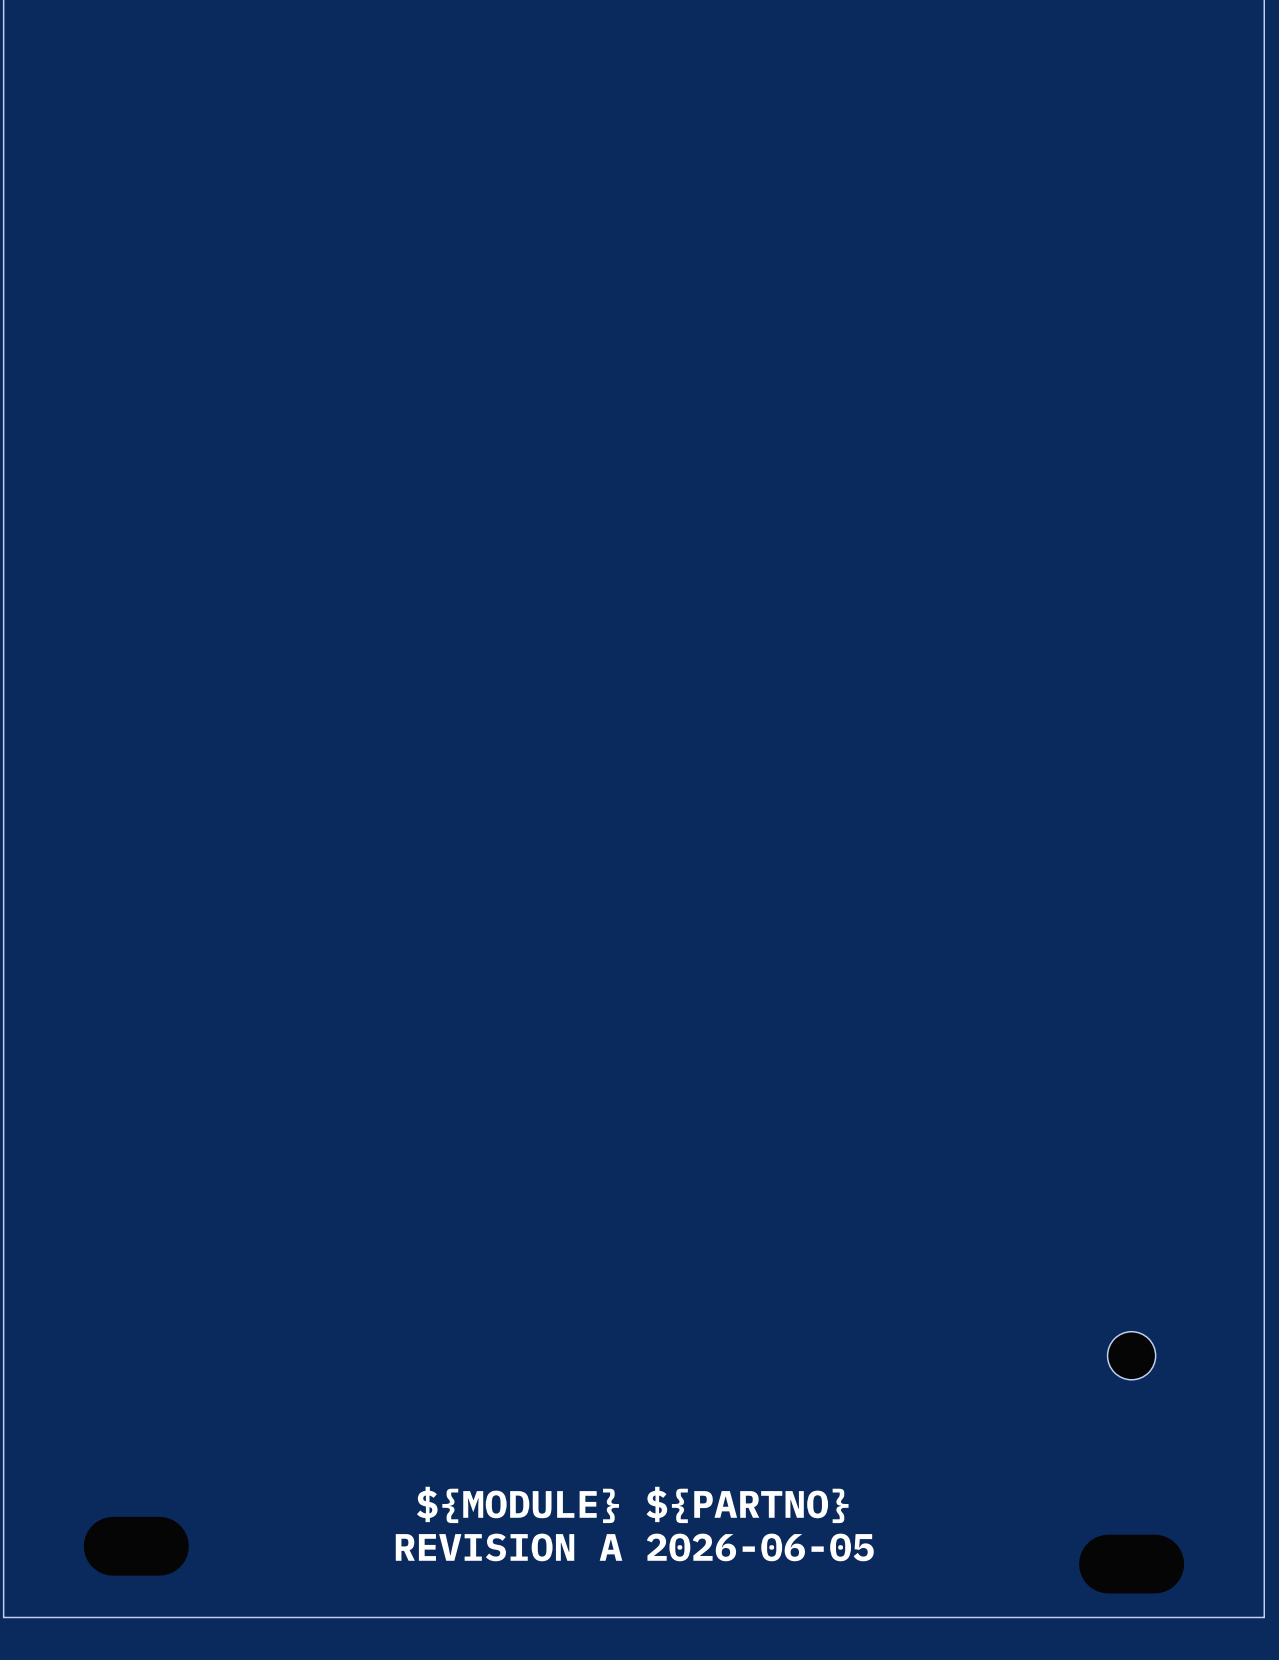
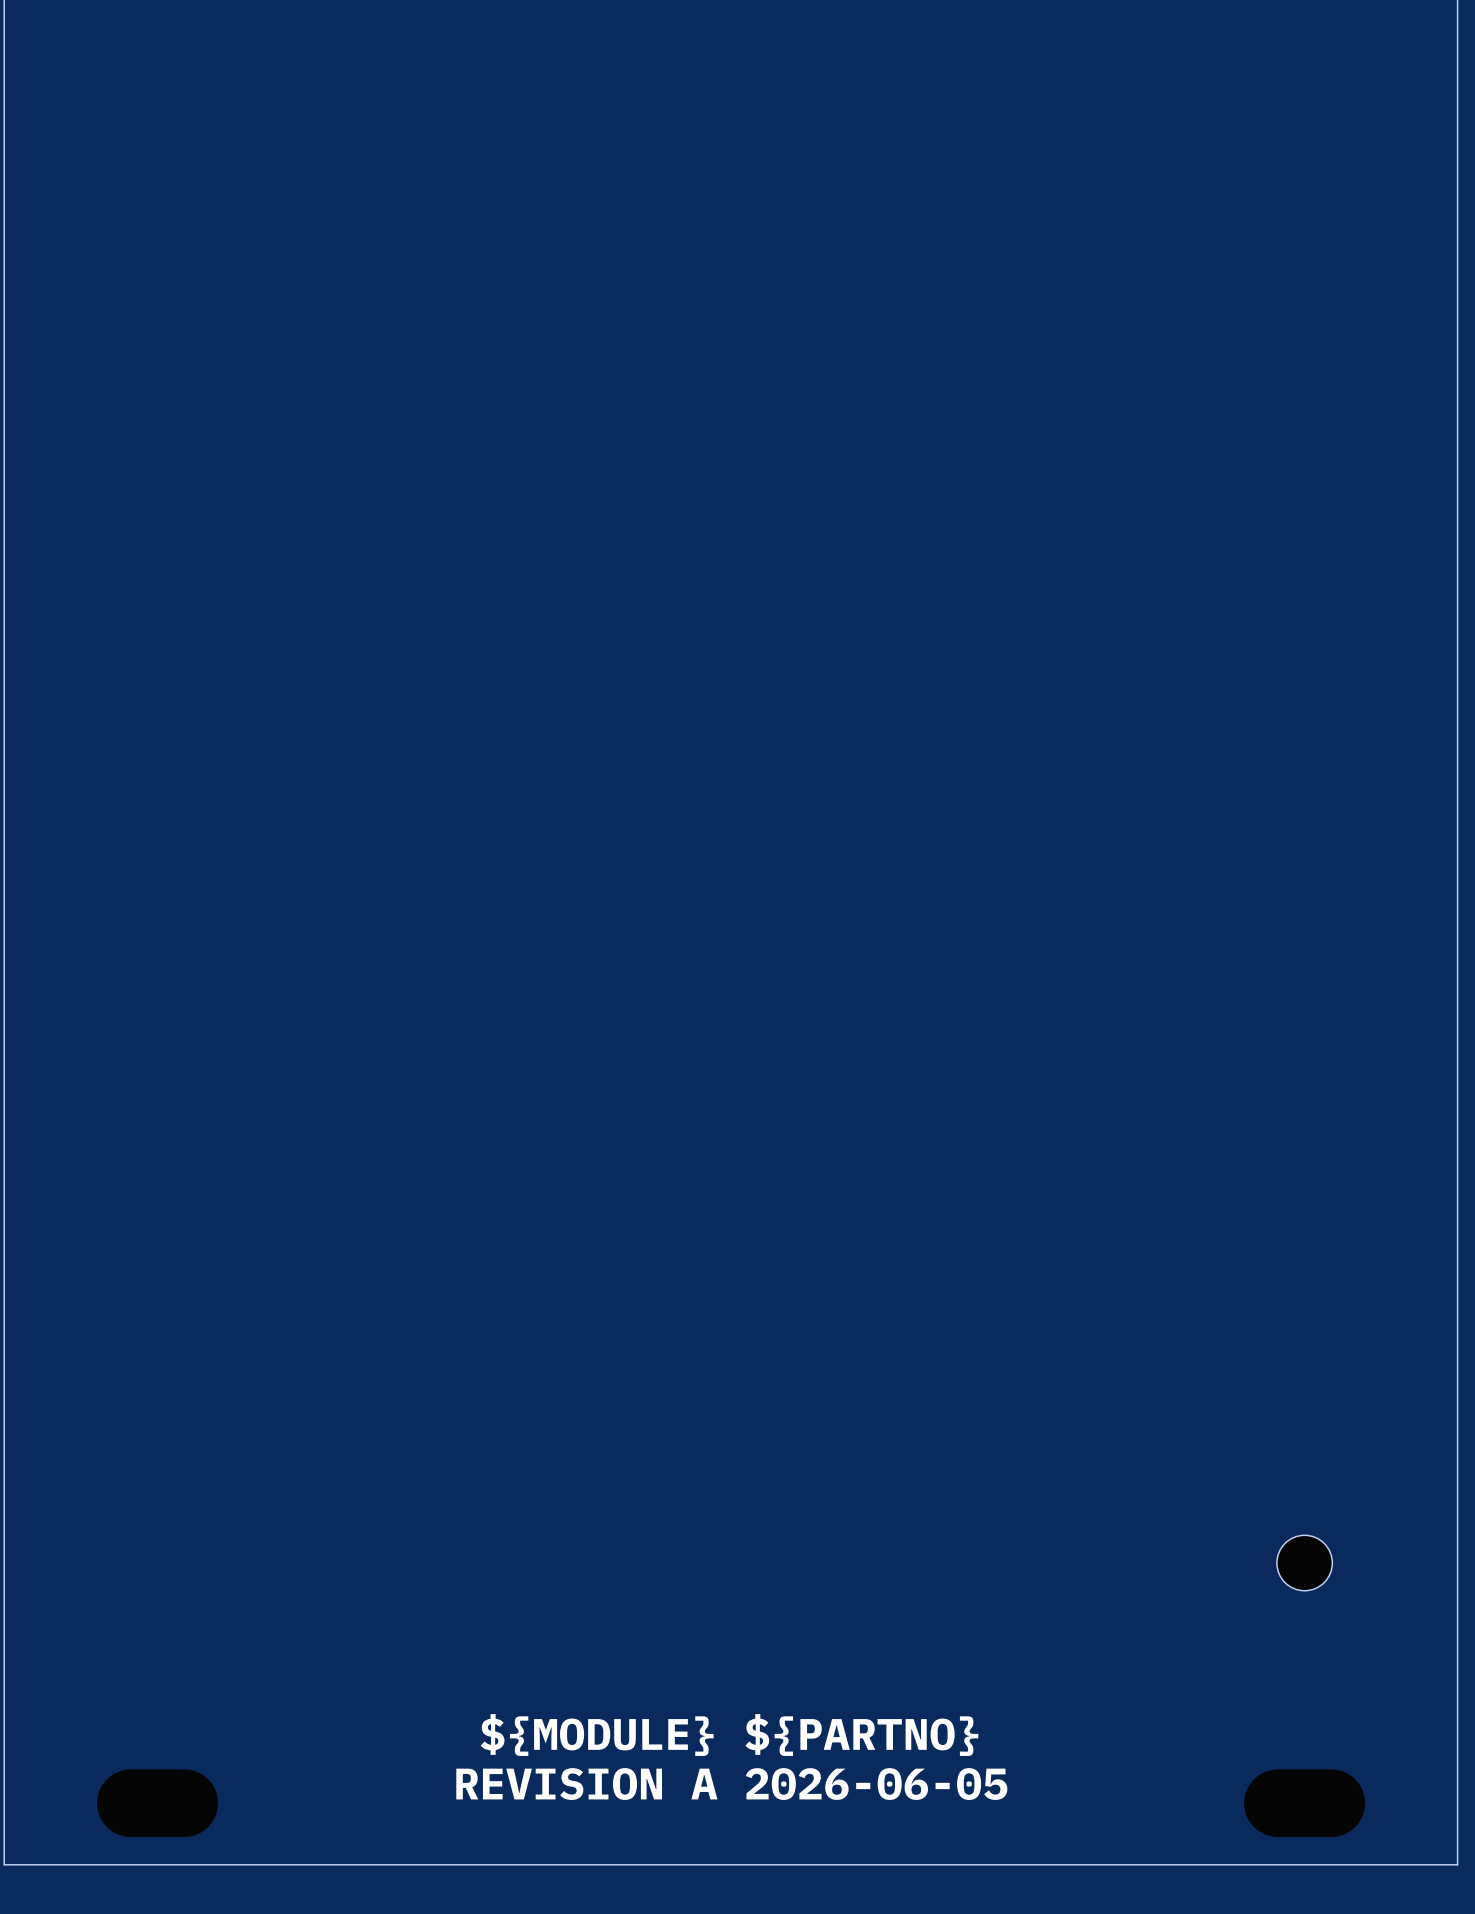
part position: (136, 1546) -> (157, 1803)

